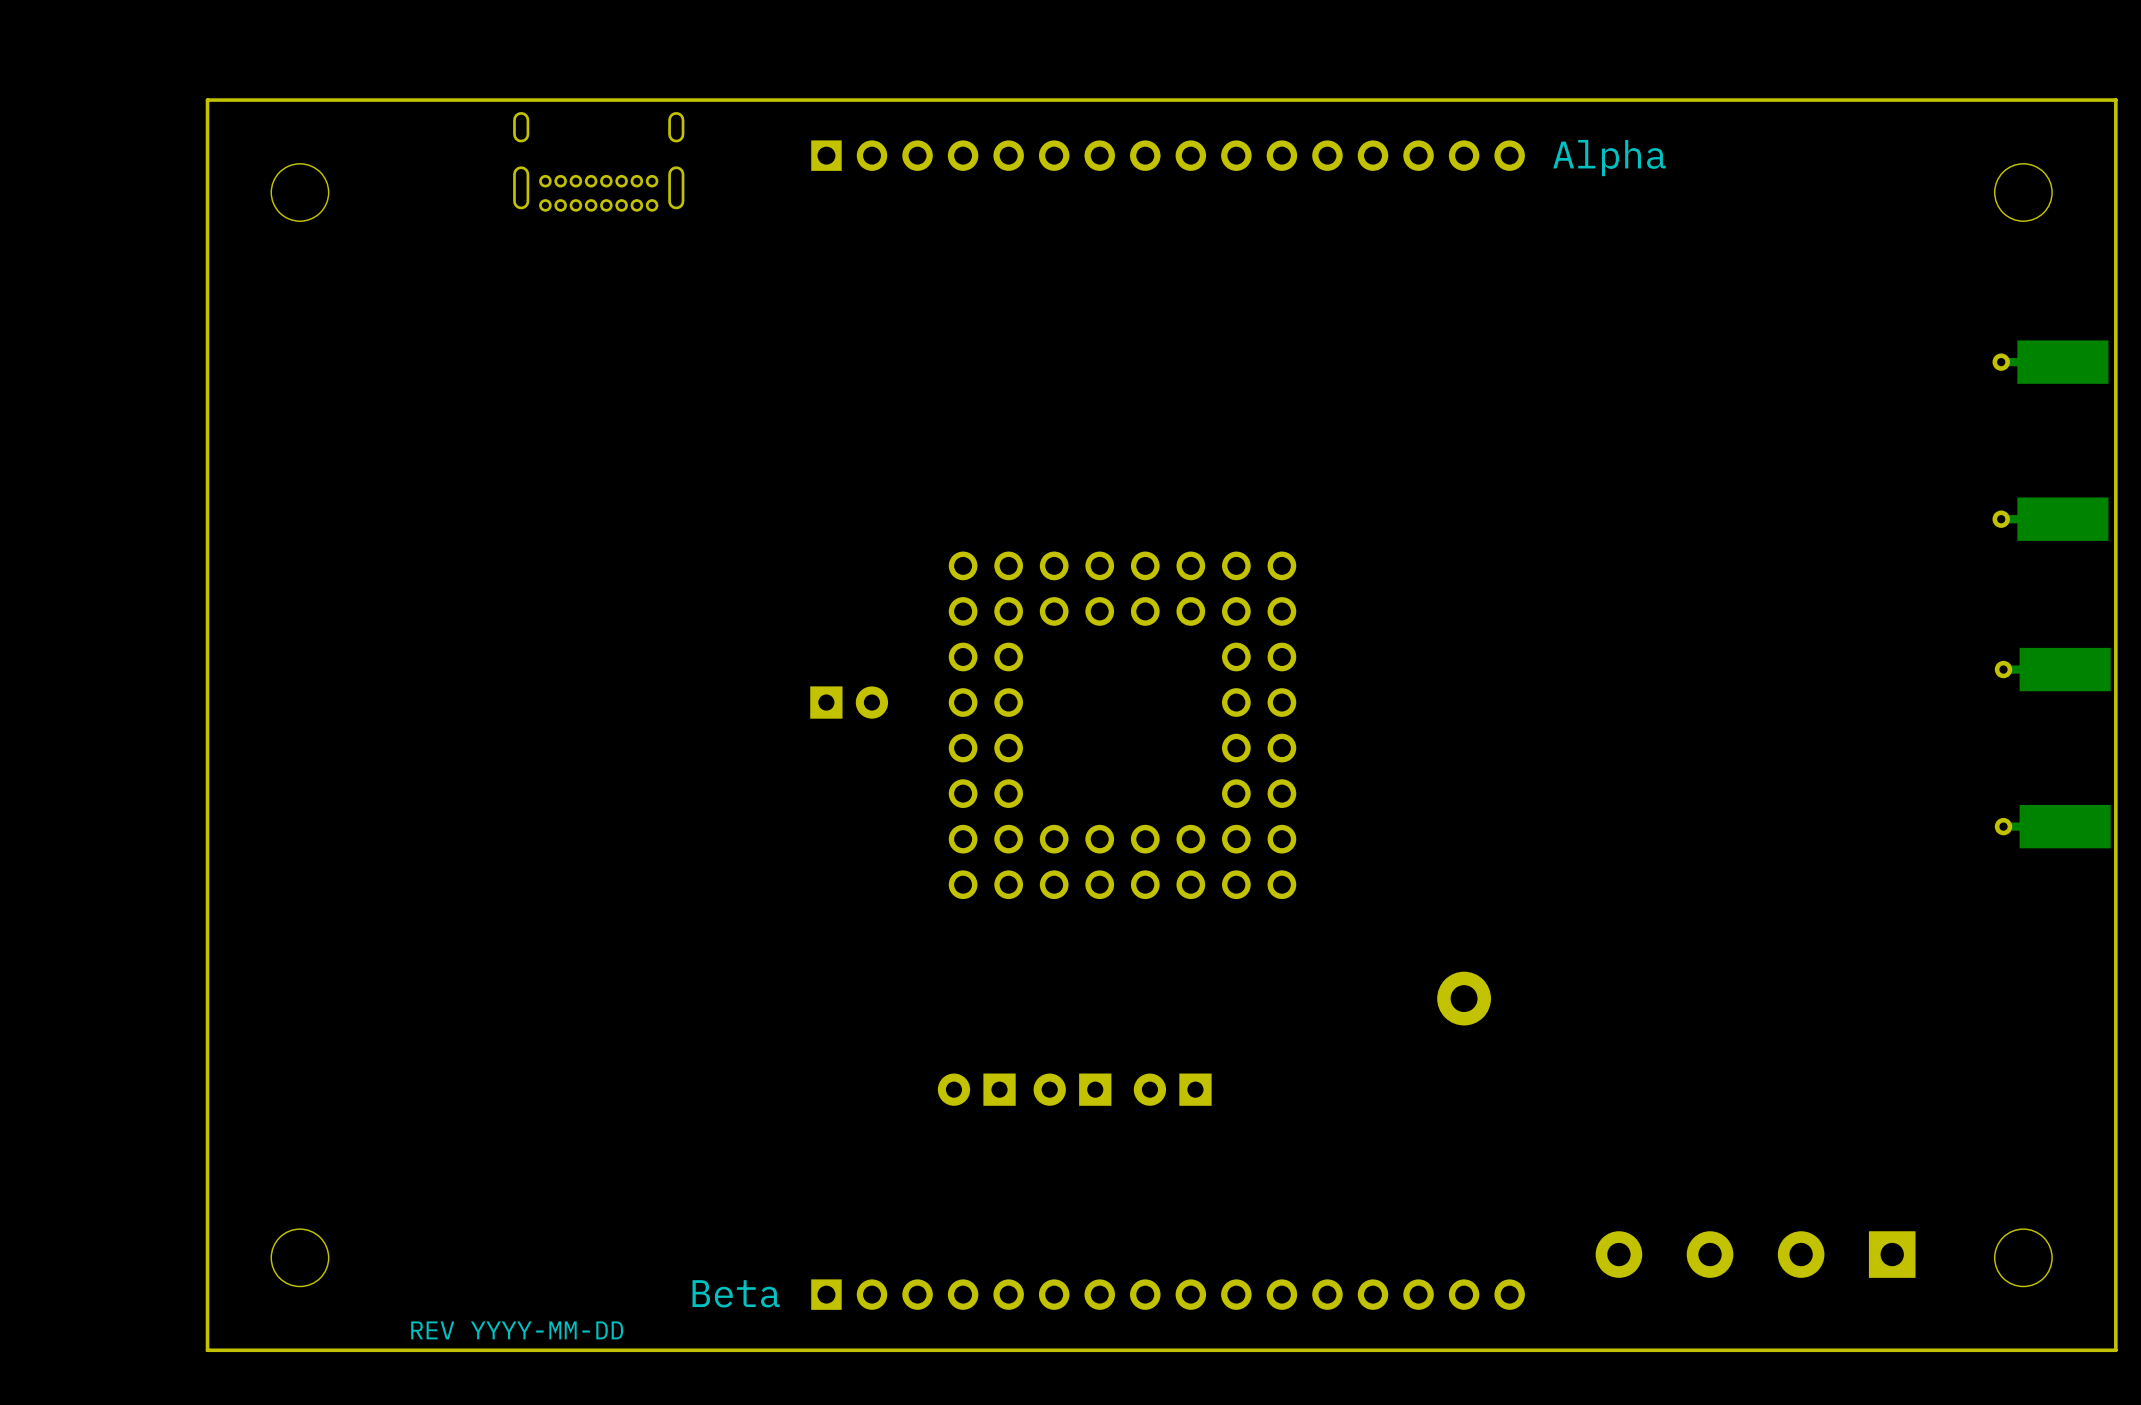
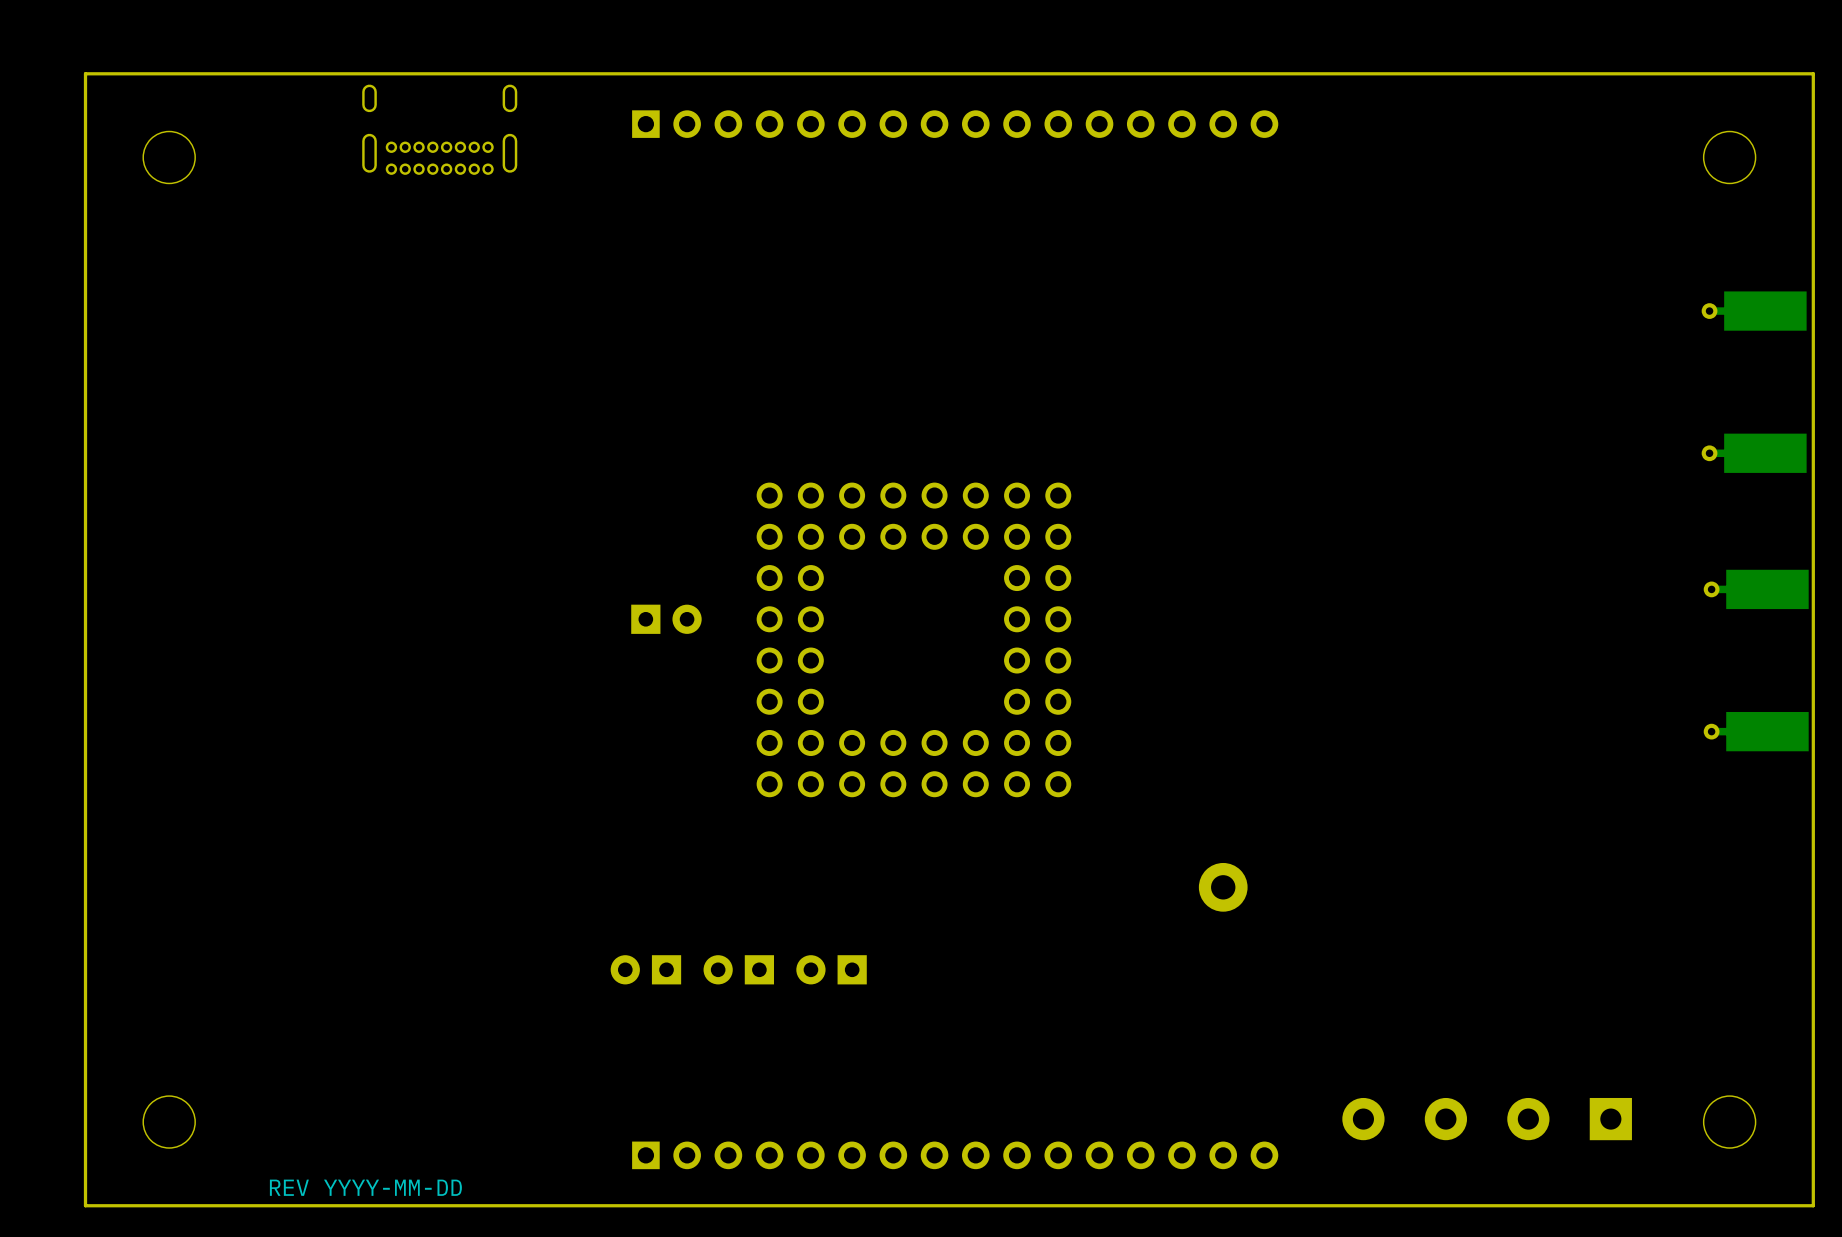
text: Alpha (1609, 158) -> none
part: none -> (645, 969)
part: none -> (738, 969)
part: (976, 1089) -> none
part: none -> (831, 969)
part: (1072, 1089) -> none
part: (1172, 1089) -> none
text: Beta (736, 1293) -> none

